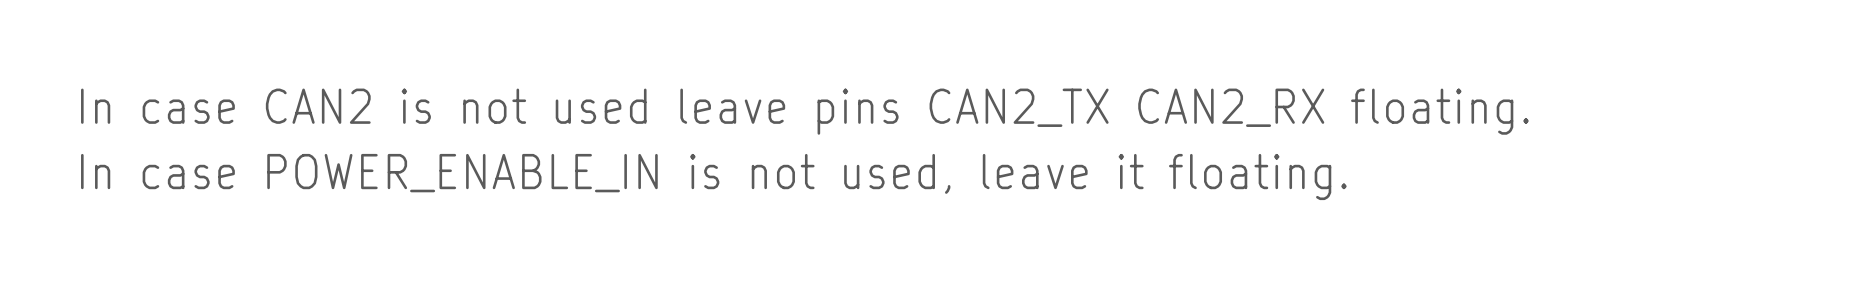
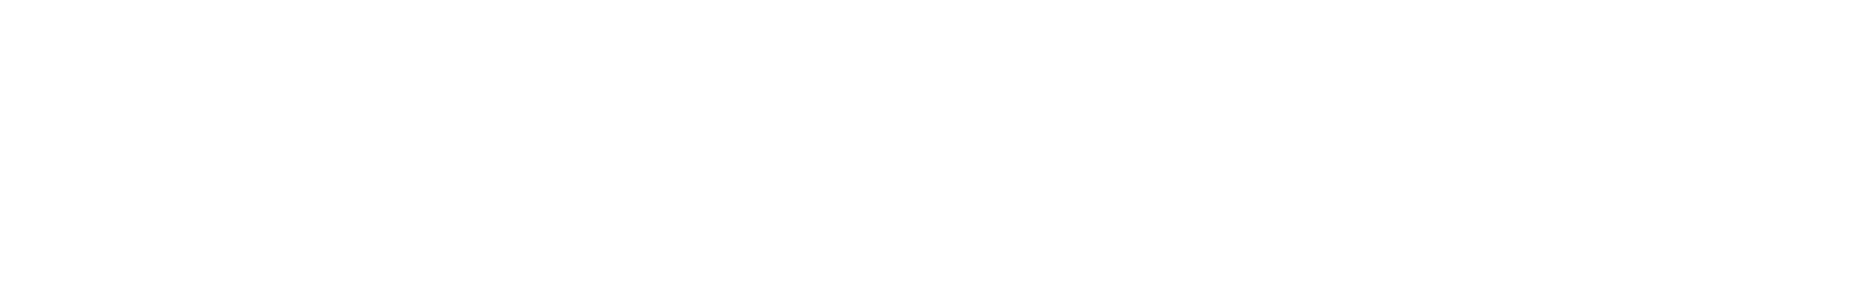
text: In case CAN2 is not used leave pins CAN2_TX CAN2_RX floating. (804, 111) -> none
text: In case POWER_ENABLE_IN is not used, leave it floating. (713, 176) -> none

